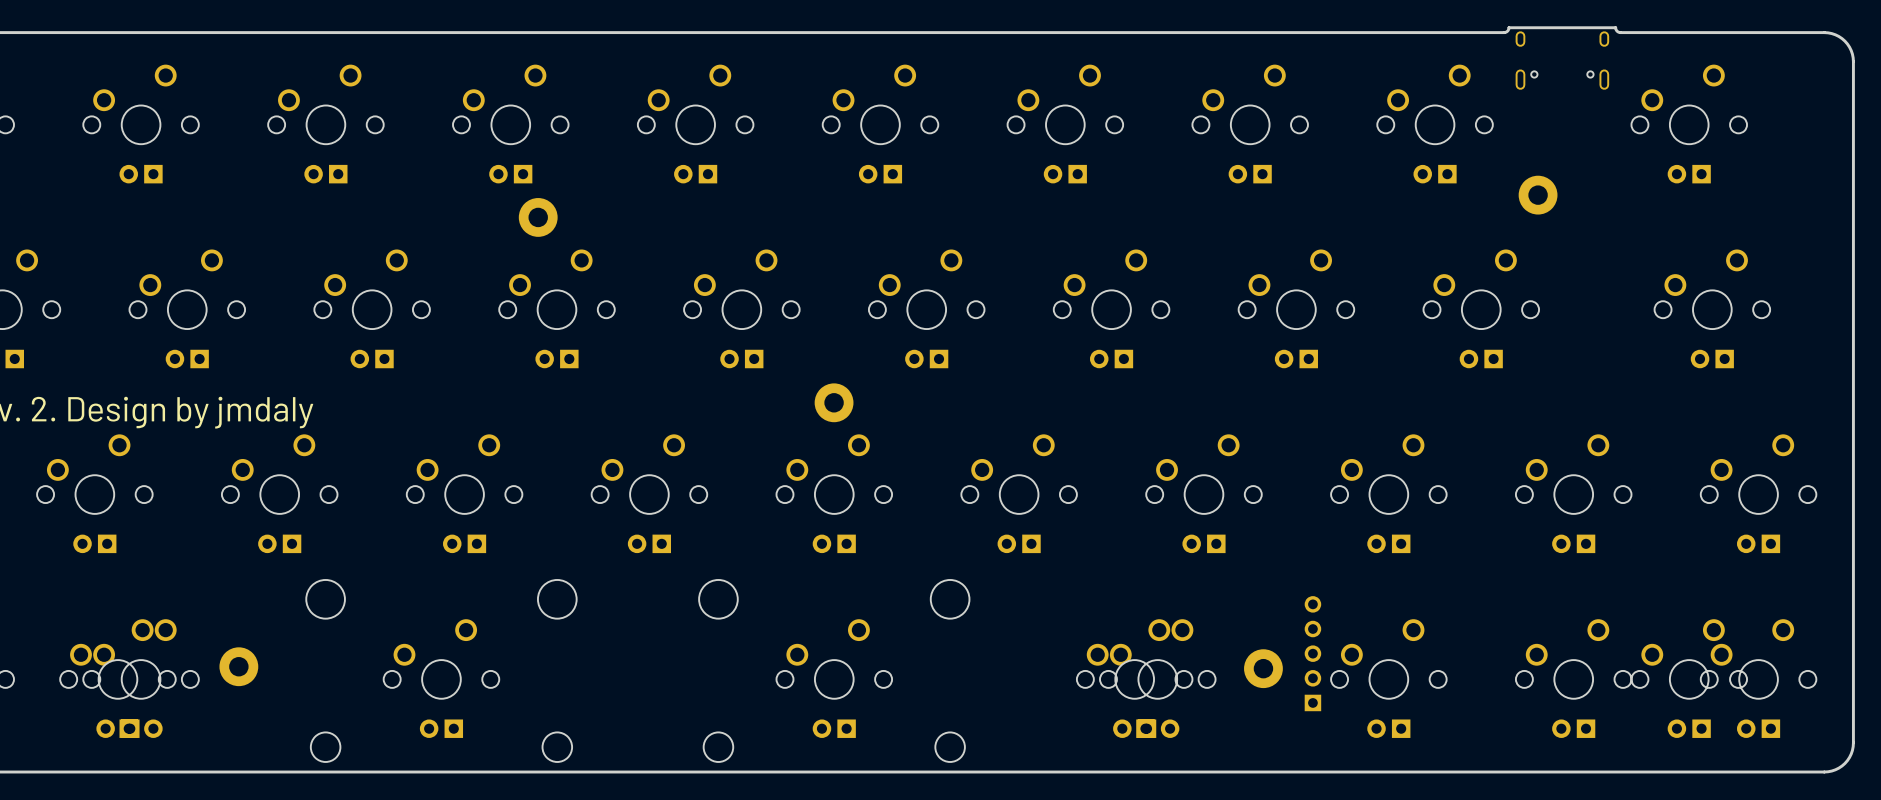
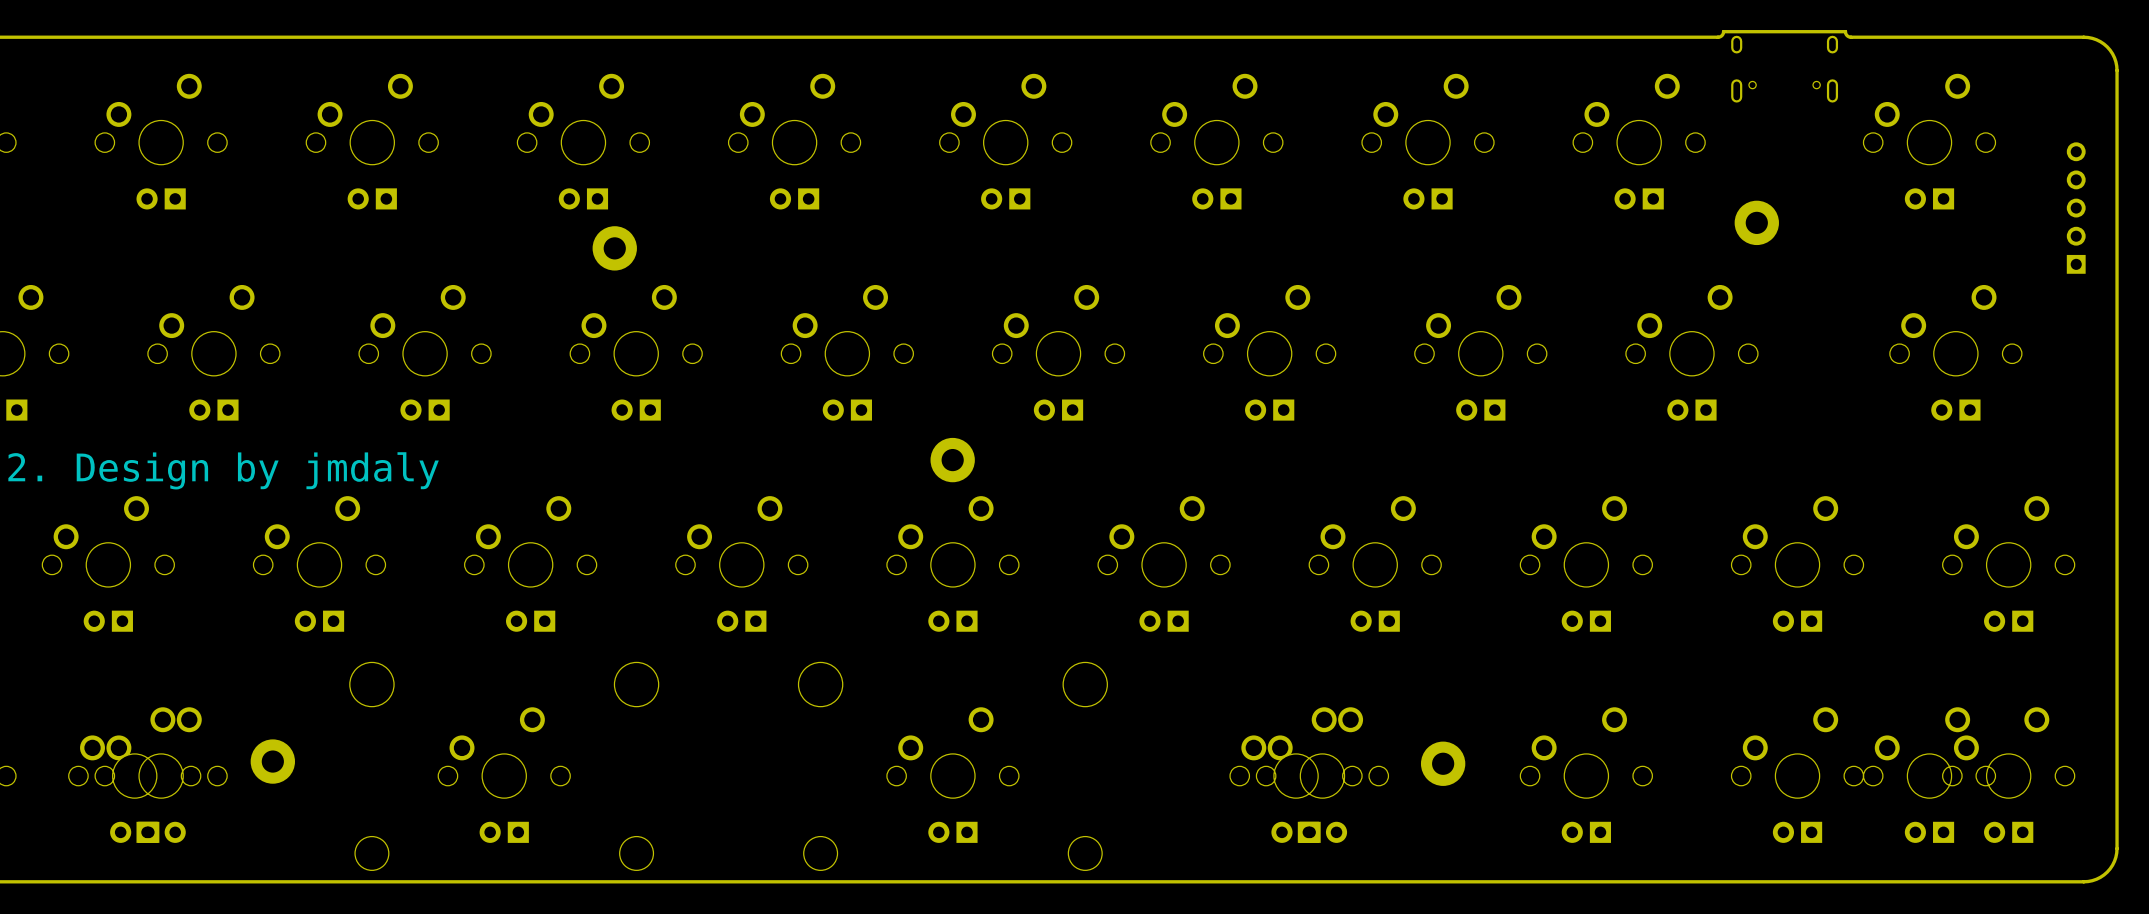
part: none -> (2076, 208)
part: (1312, 653) -> none

